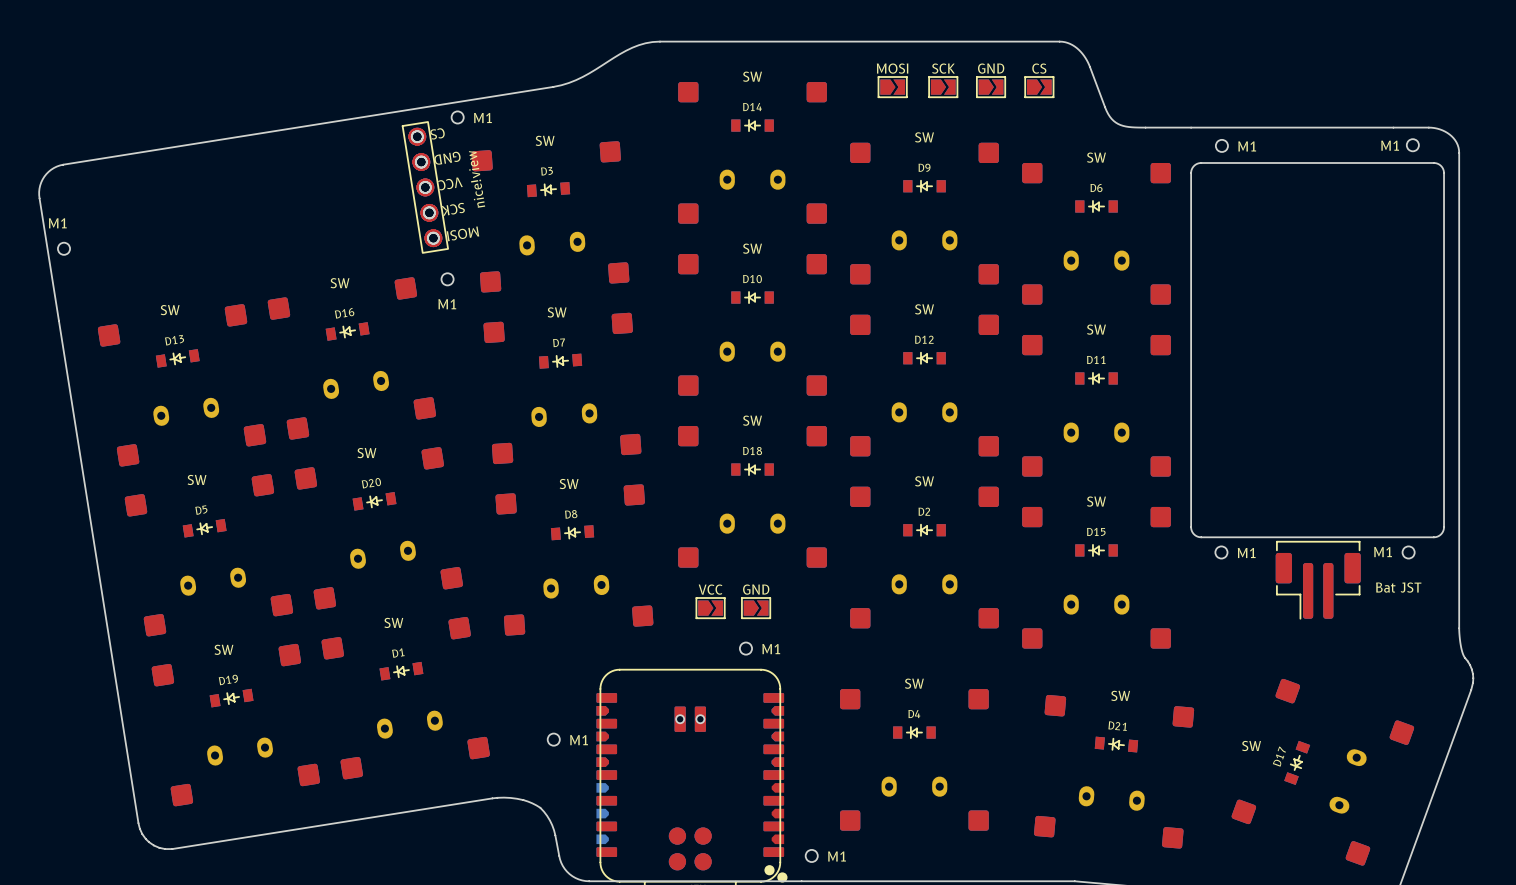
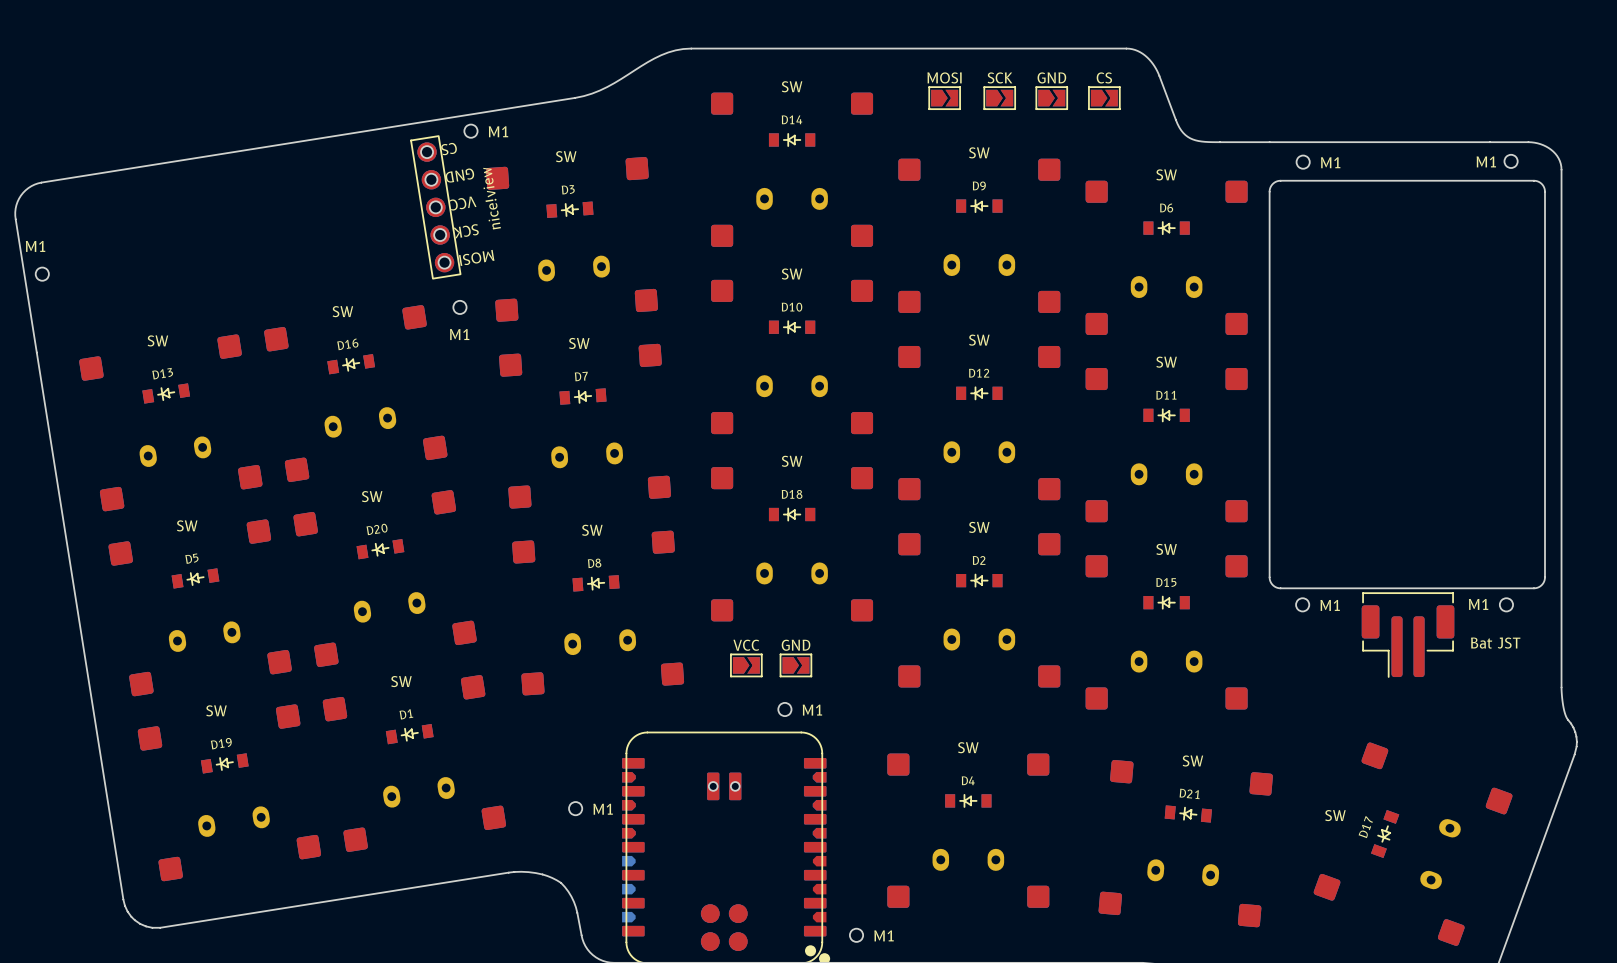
part: nice!view (425, 187) -> none
part: (425, 187) -> none
part: none -> nice!view (435, 207)

